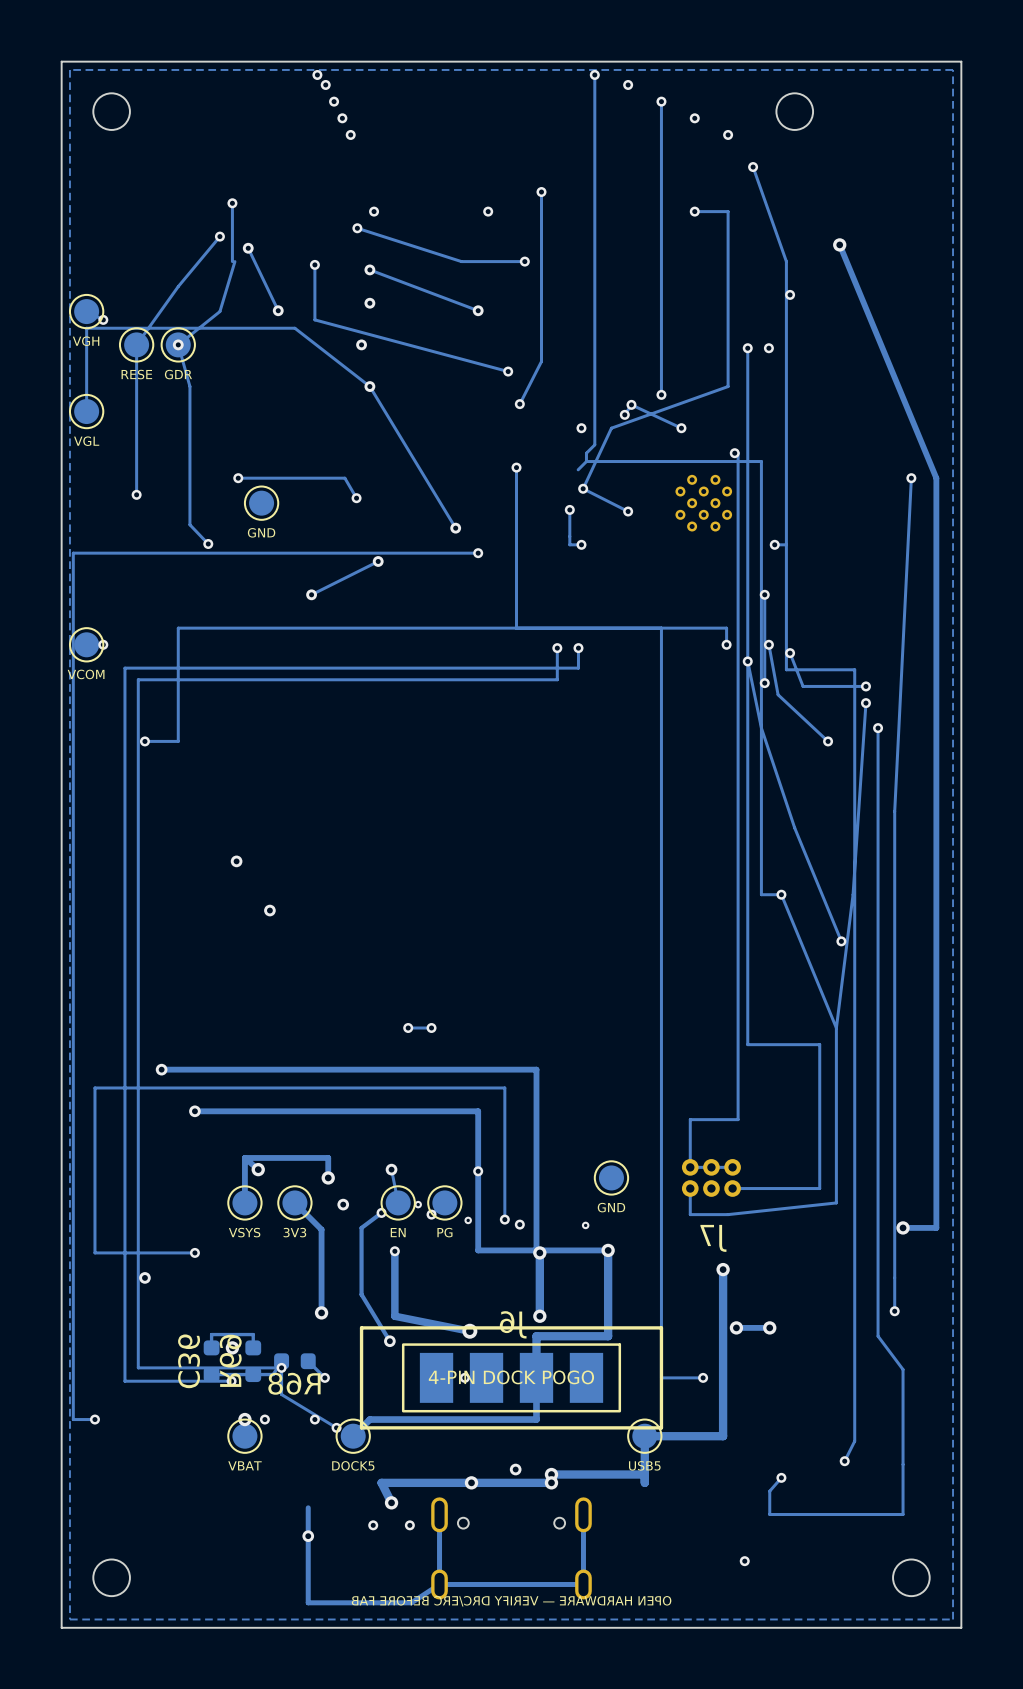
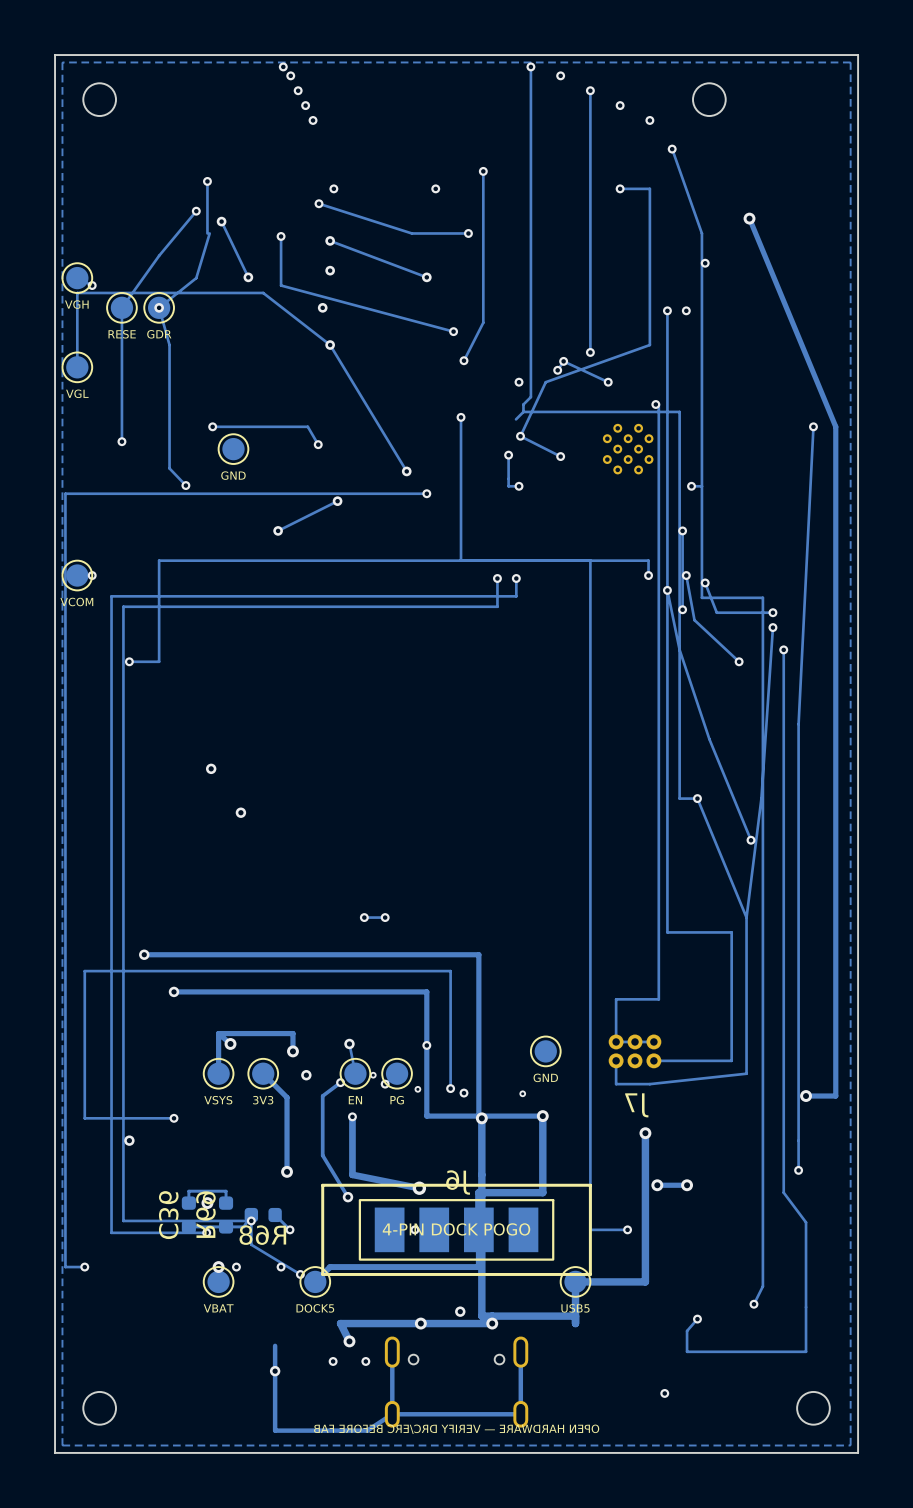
track: none -> (481, 1174) (481, 1316) (492, 1316)
via: (539, 1316) -> none
via: (551, 1474) -> none

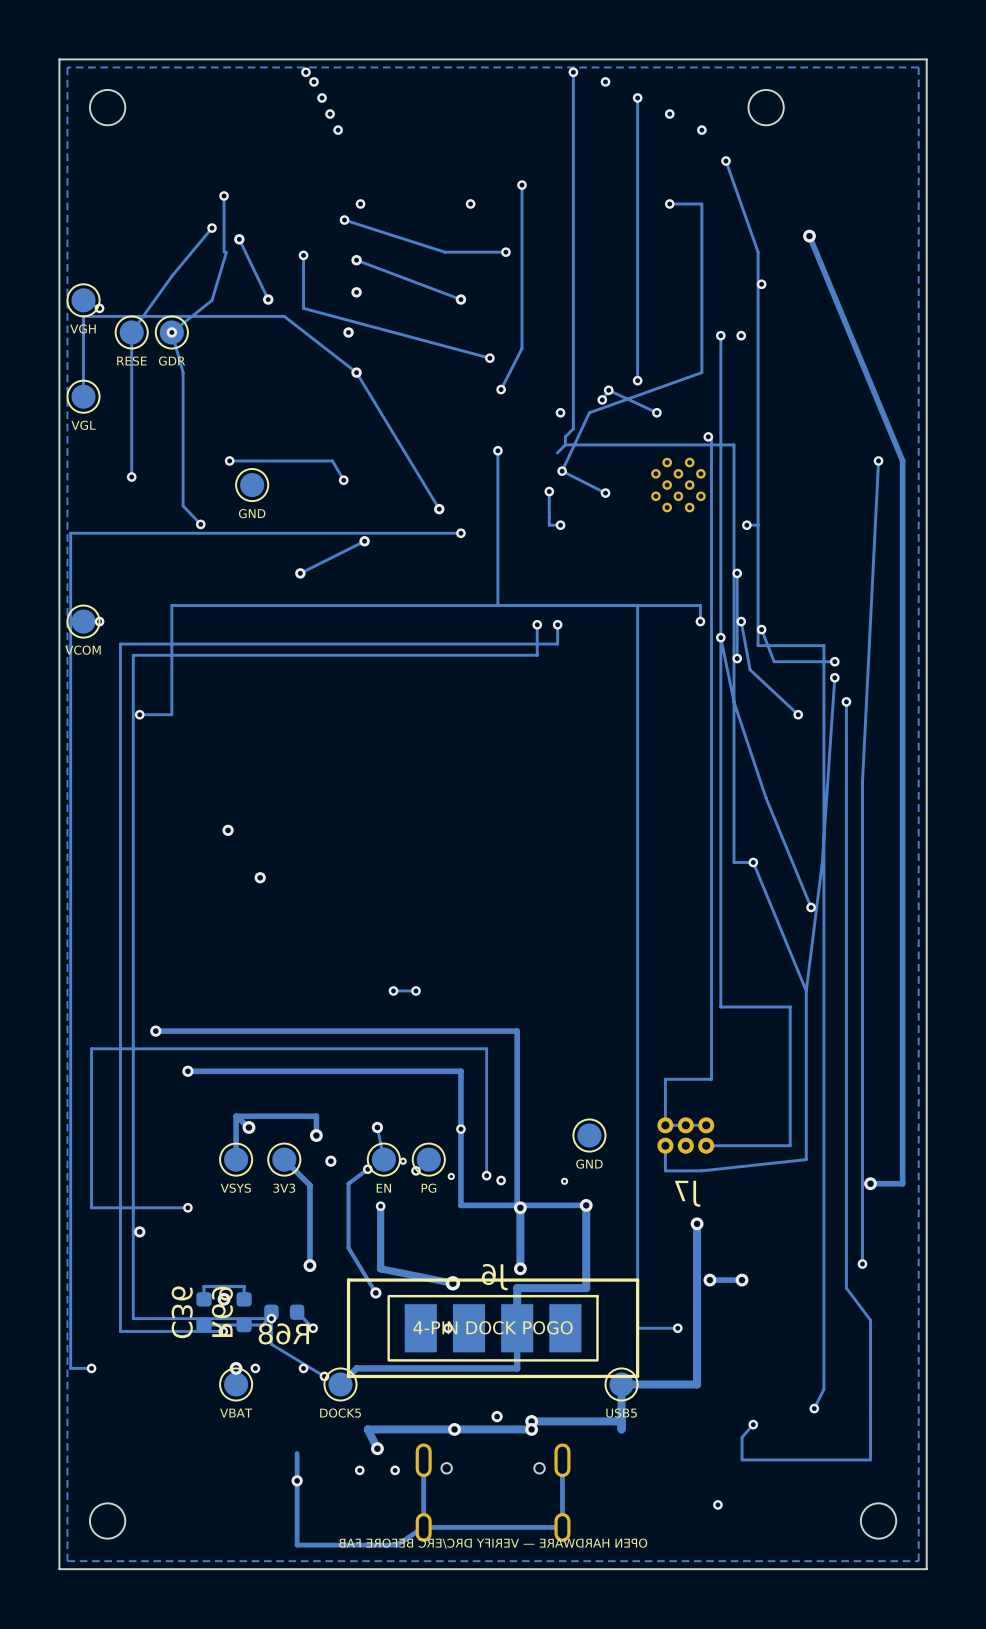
track: (481, 1174) (481, 1316) (492, 1316) -> none
via: none -> (520, 1268)
via: none -> (531, 1421)

